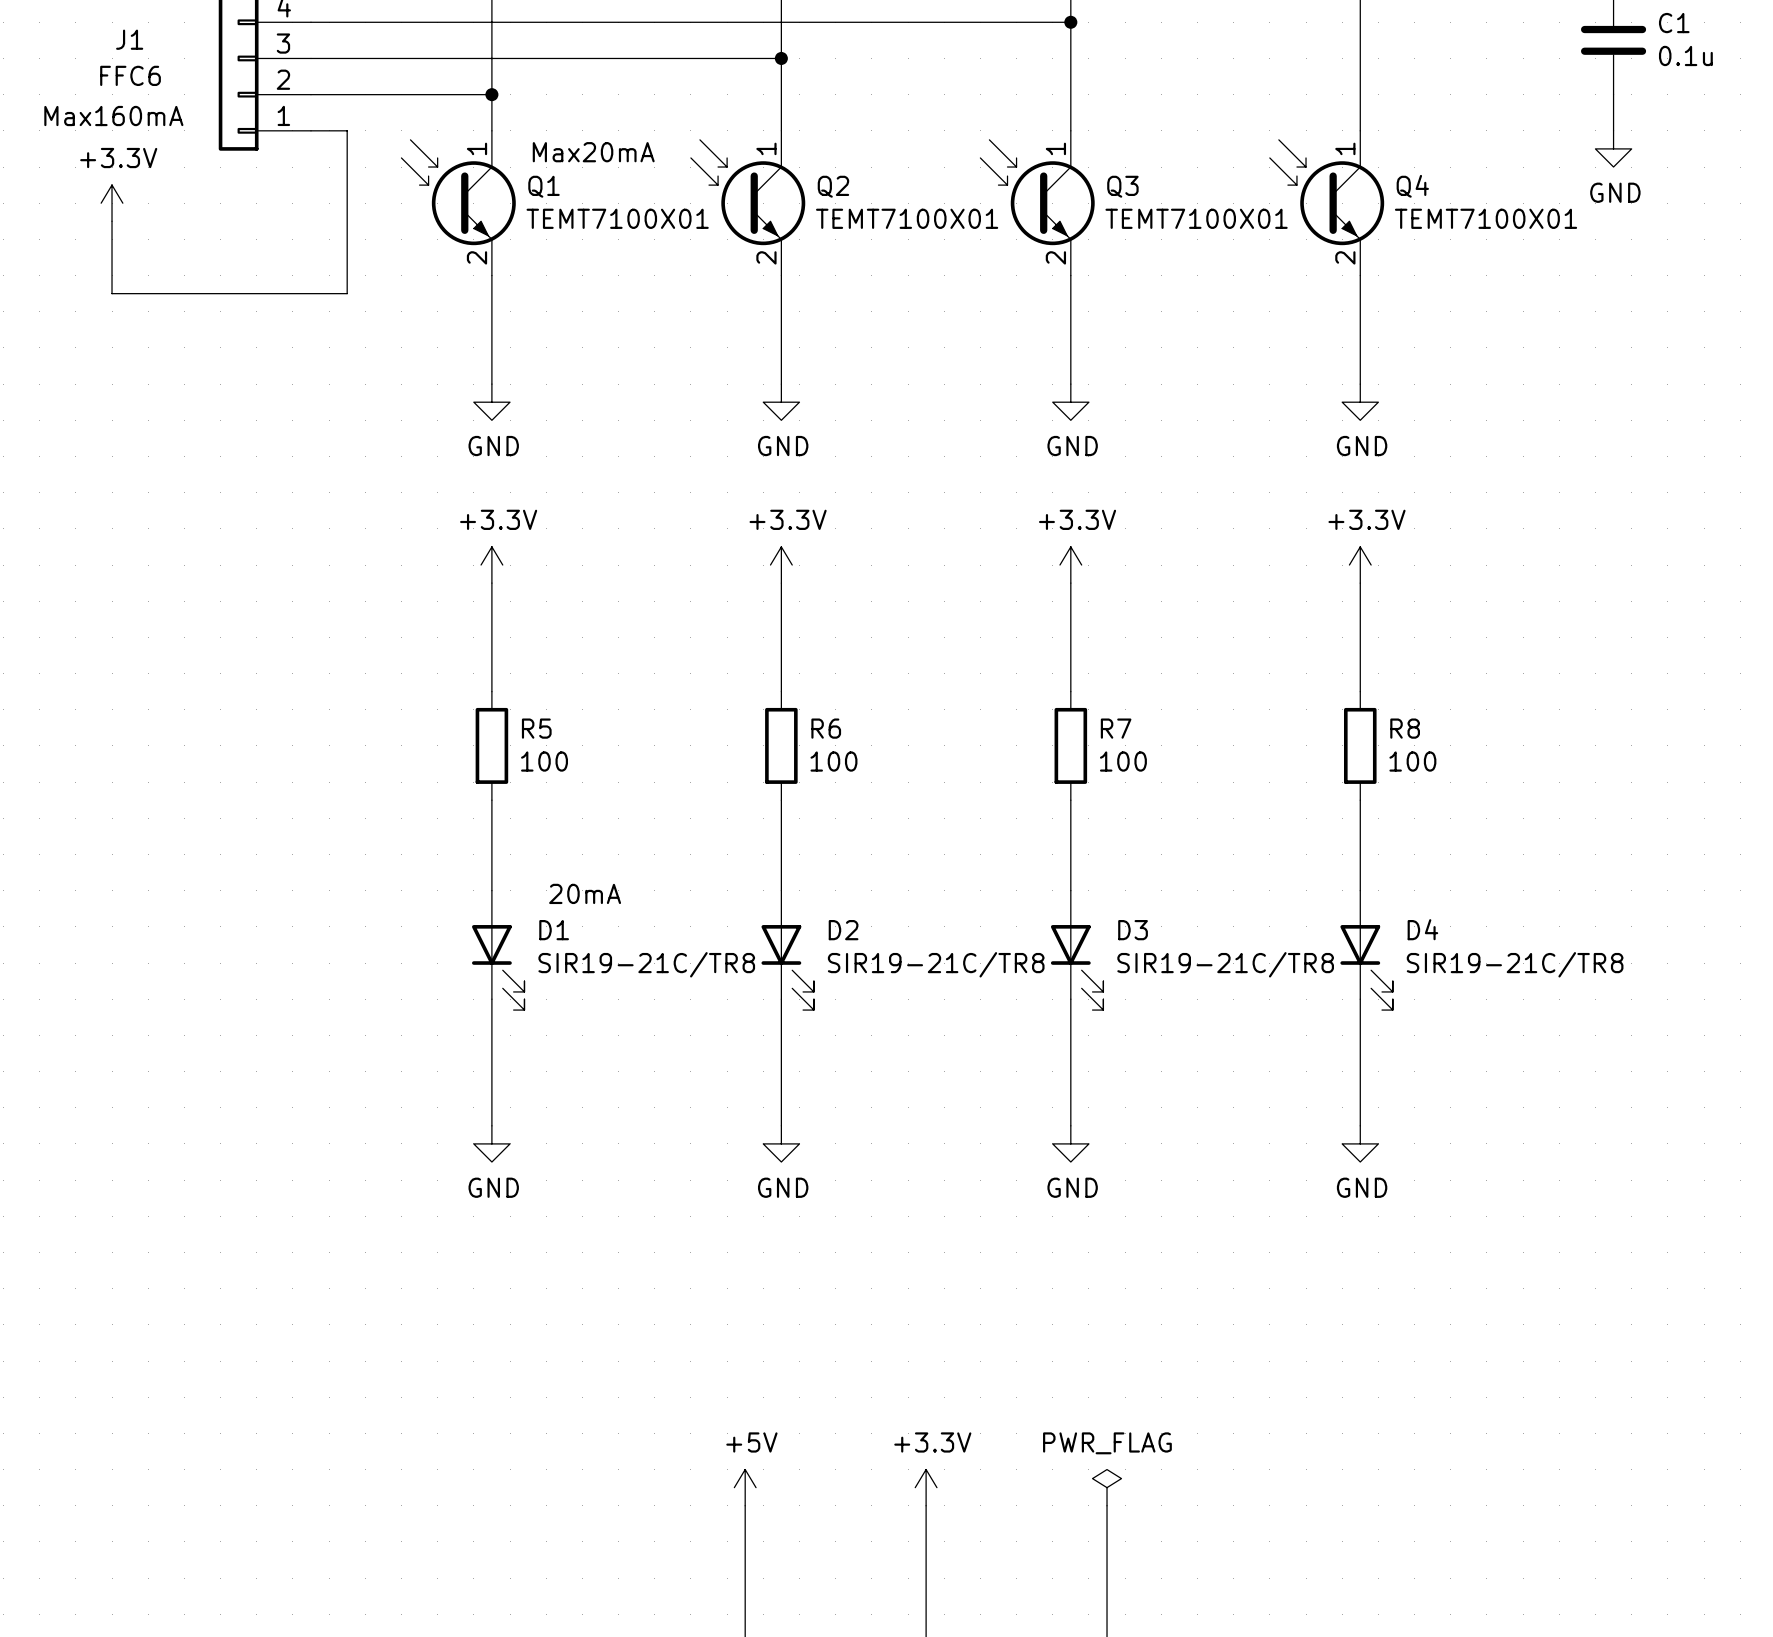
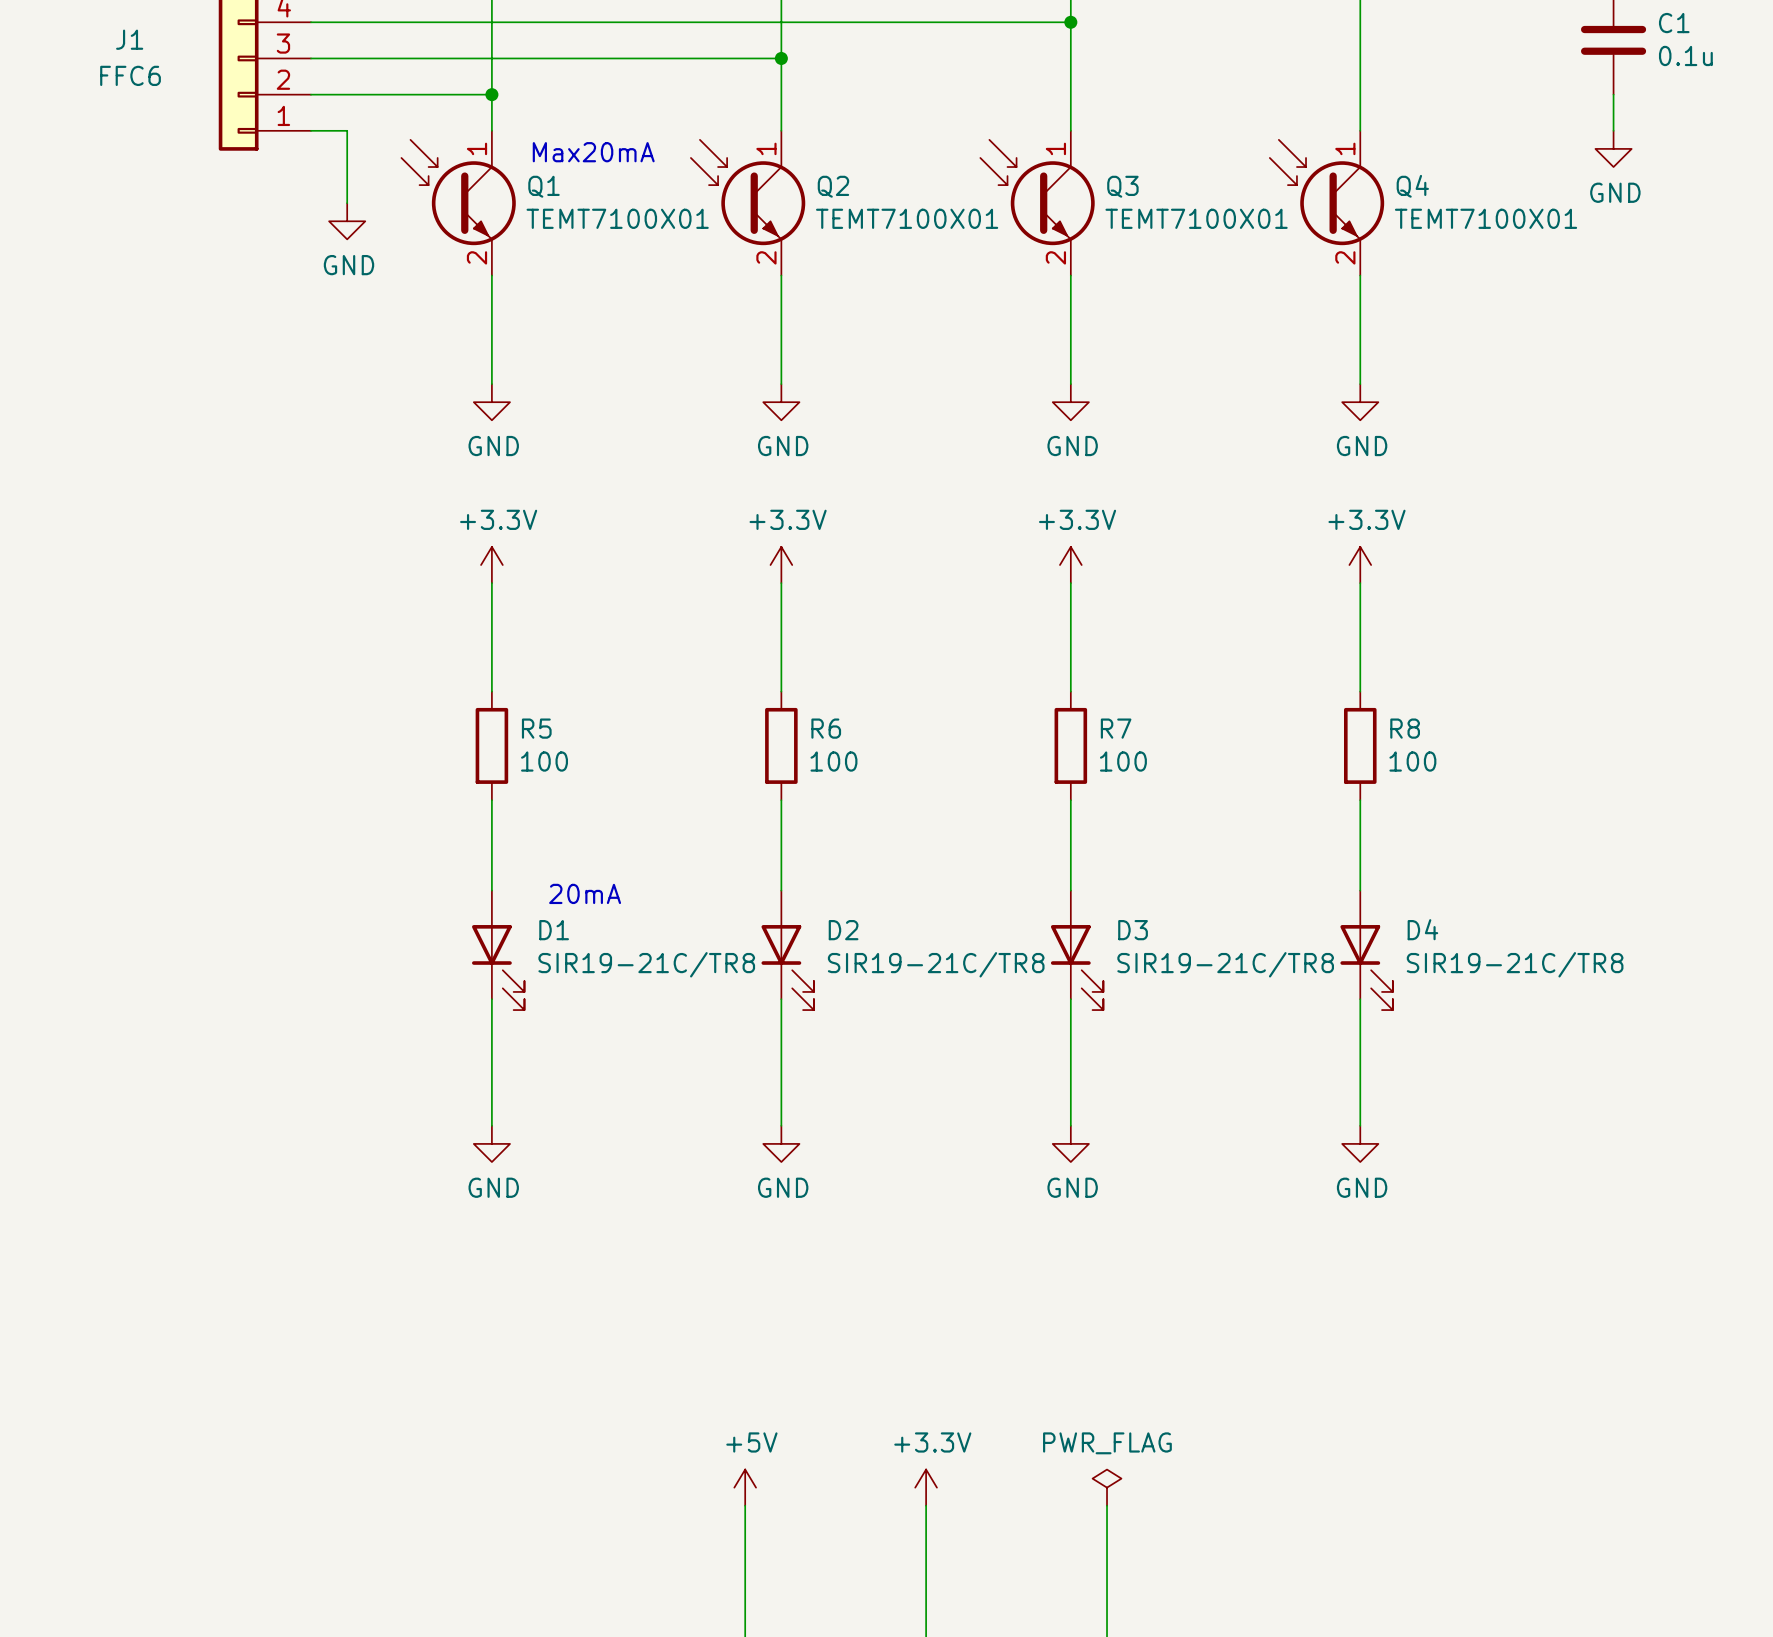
text: Max160mA (113, 116) -> none
power symbol: +3.3V (112, 203) -> none
wire: (347, 203) (347, 293) (112, 293) (112, 221) -> none
power symbol: none -> GND (347, 221)

